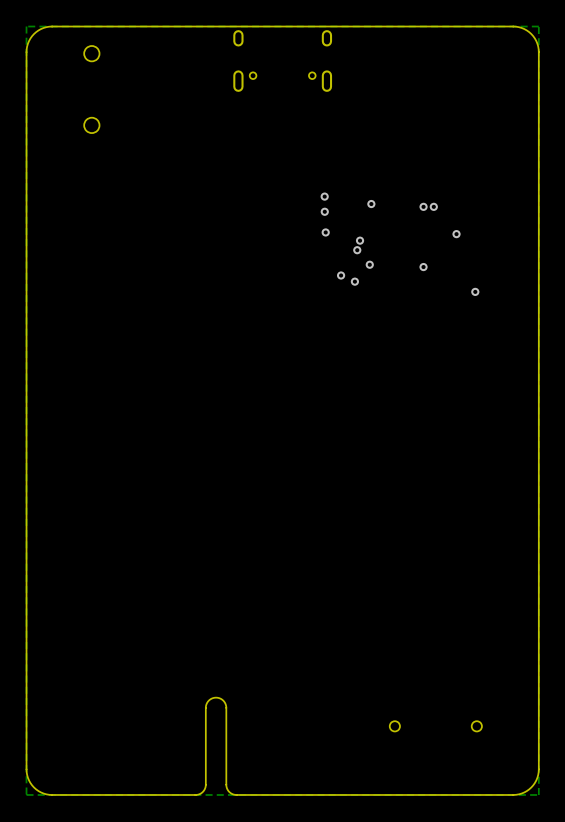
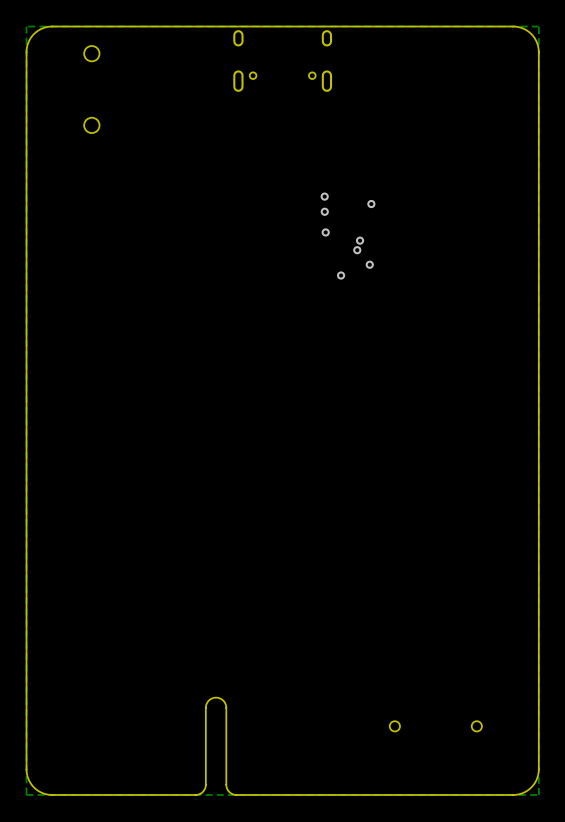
via: (423, 206) -> none
via: (433, 206) -> none
via: (456, 234) -> none
via: (423, 267) -> none
via: (354, 281) -> none
via: (475, 291) -> none

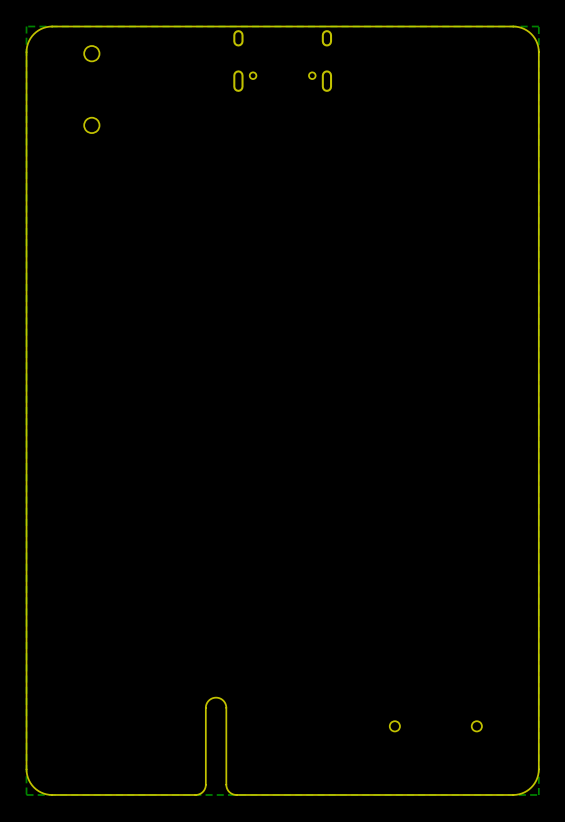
via: (324, 196) -> none
via: (371, 204) -> none
via: (324, 211) -> none
via: (325, 232) -> none
via: (360, 240) -> none
via: (357, 250) -> none
via: (369, 264) -> none
via: (341, 275) -> none

